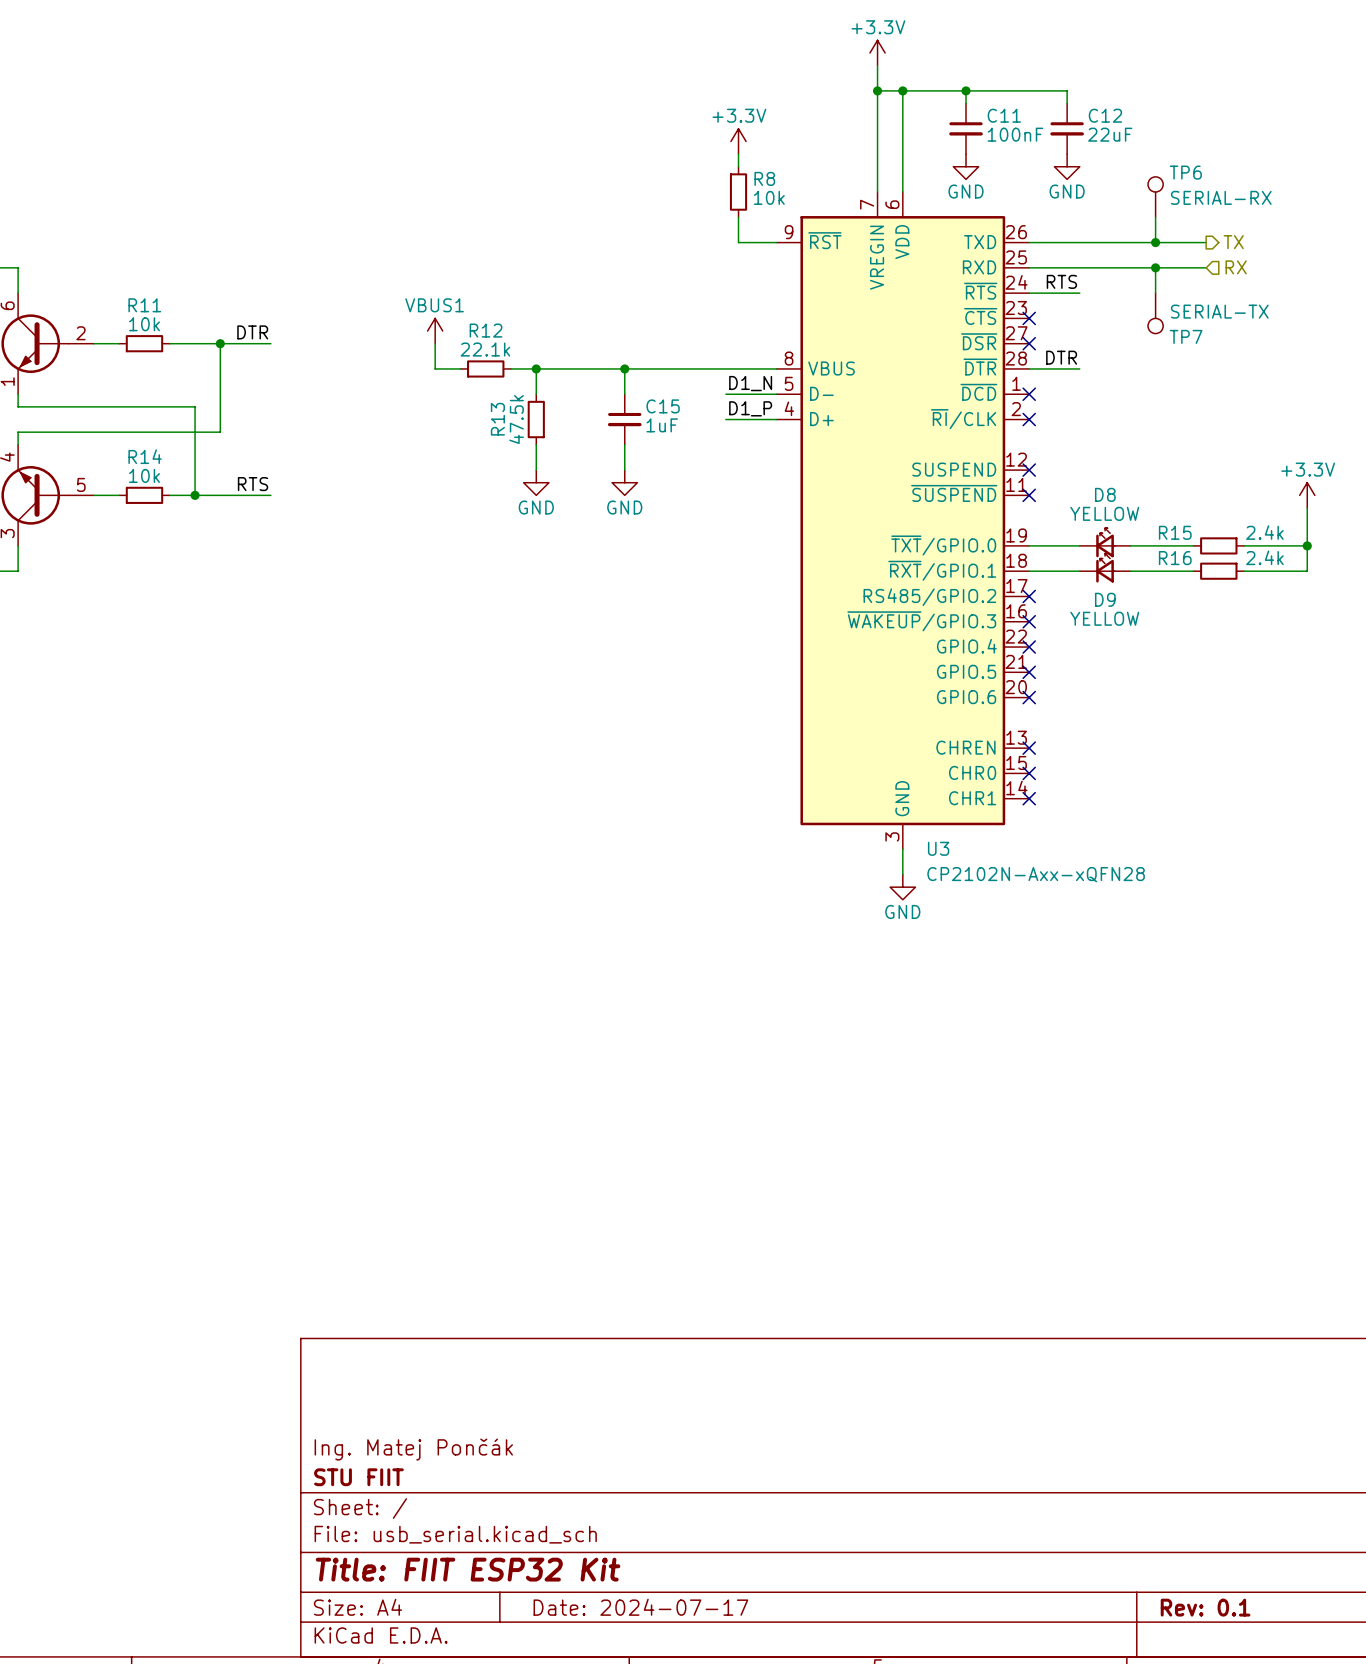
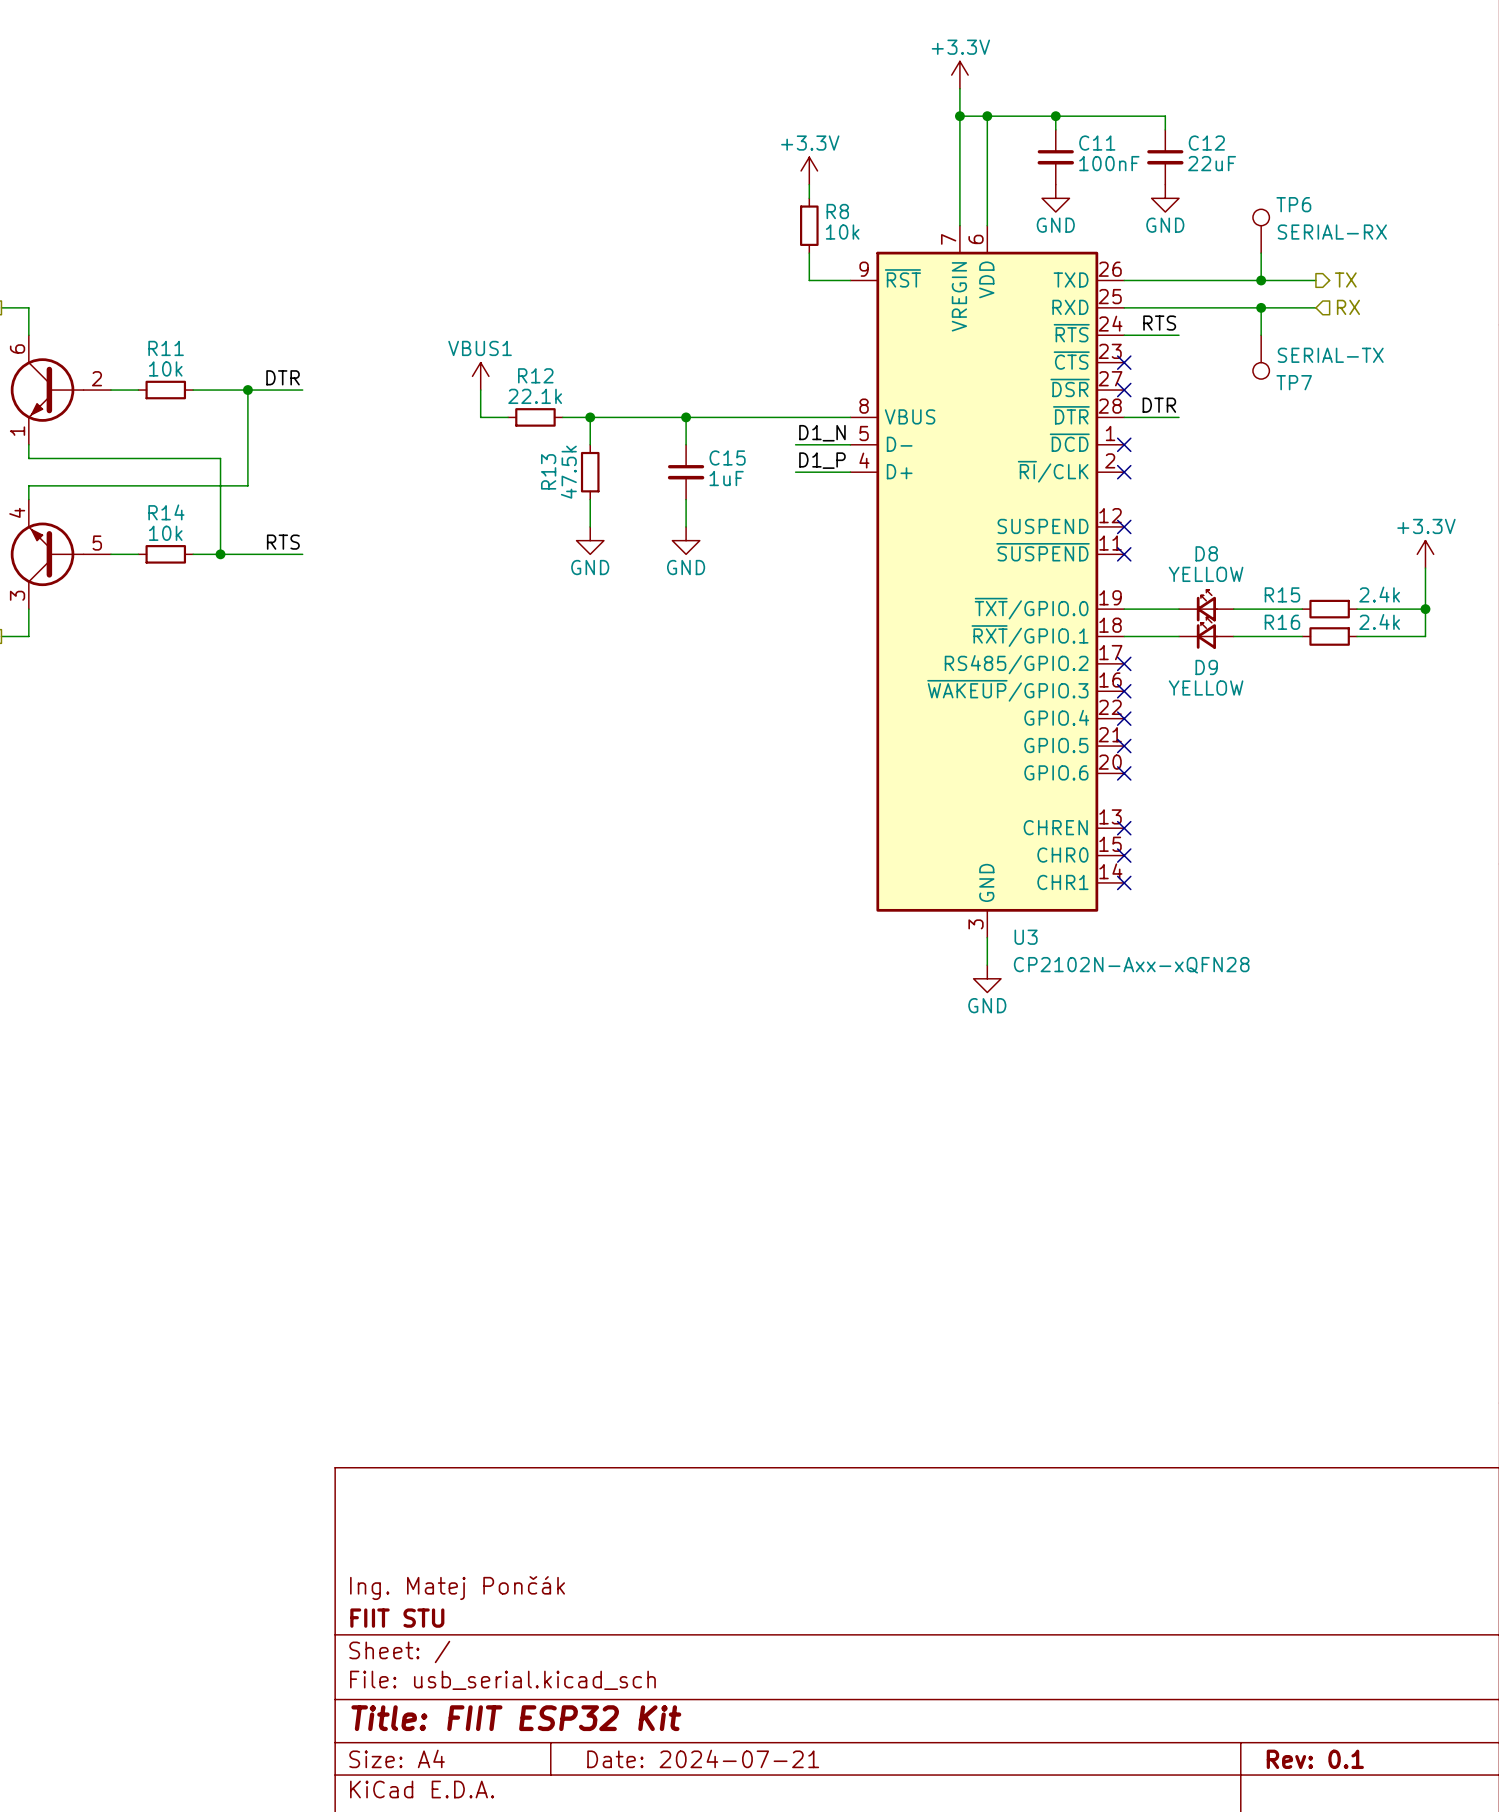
title block: STU FIIT (358, 1477) -> FIIT STU (397, 1618)
title block: Date: 2024-07-17 (640, 1607) -> Date: 2024-07-21 (703, 1758)

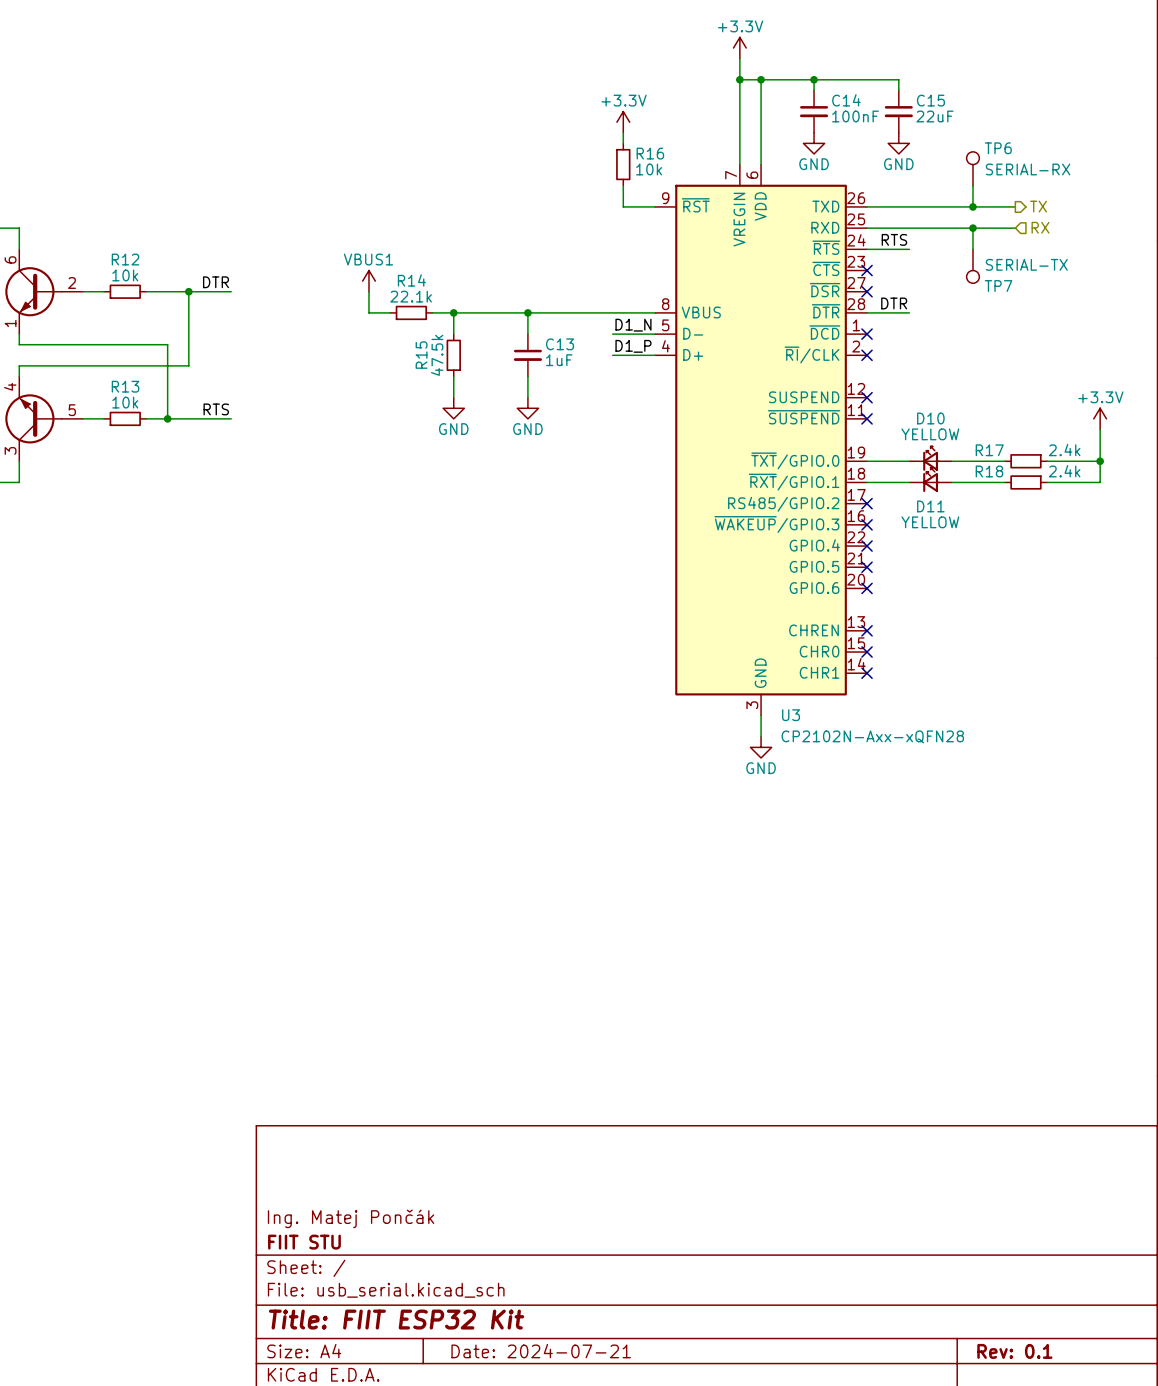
C11 name: C11 (1097, 143) -> C14 (846, 100)
C12 name: C12 (1206, 143) -> C15 (930, 100)
R8 name: R8 (837, 211) -> R16 (650, 153)
R11 name: R11 (166, 348) -> R12 (125, 259)
R12 name: R12 (535, 375) -> R14 (411, 280)
C15 name: C15 (727, 457) -> C13 (560, 344)
R13 name: R13 (548, 471) -> R15 (421, 355)
R14 name: R14 (166, 512) -> R13 (125, 386)
D8 name: D8 (1206, 553) -> D10 (930, 418)
R15 name: R15 (1282, 594) -> R17 (989, 450)
R16 name: R16 (1282, 622) -> R18 (989, 471)
D9 name: D9 (1206, 667) -> D11 (930, 506)

